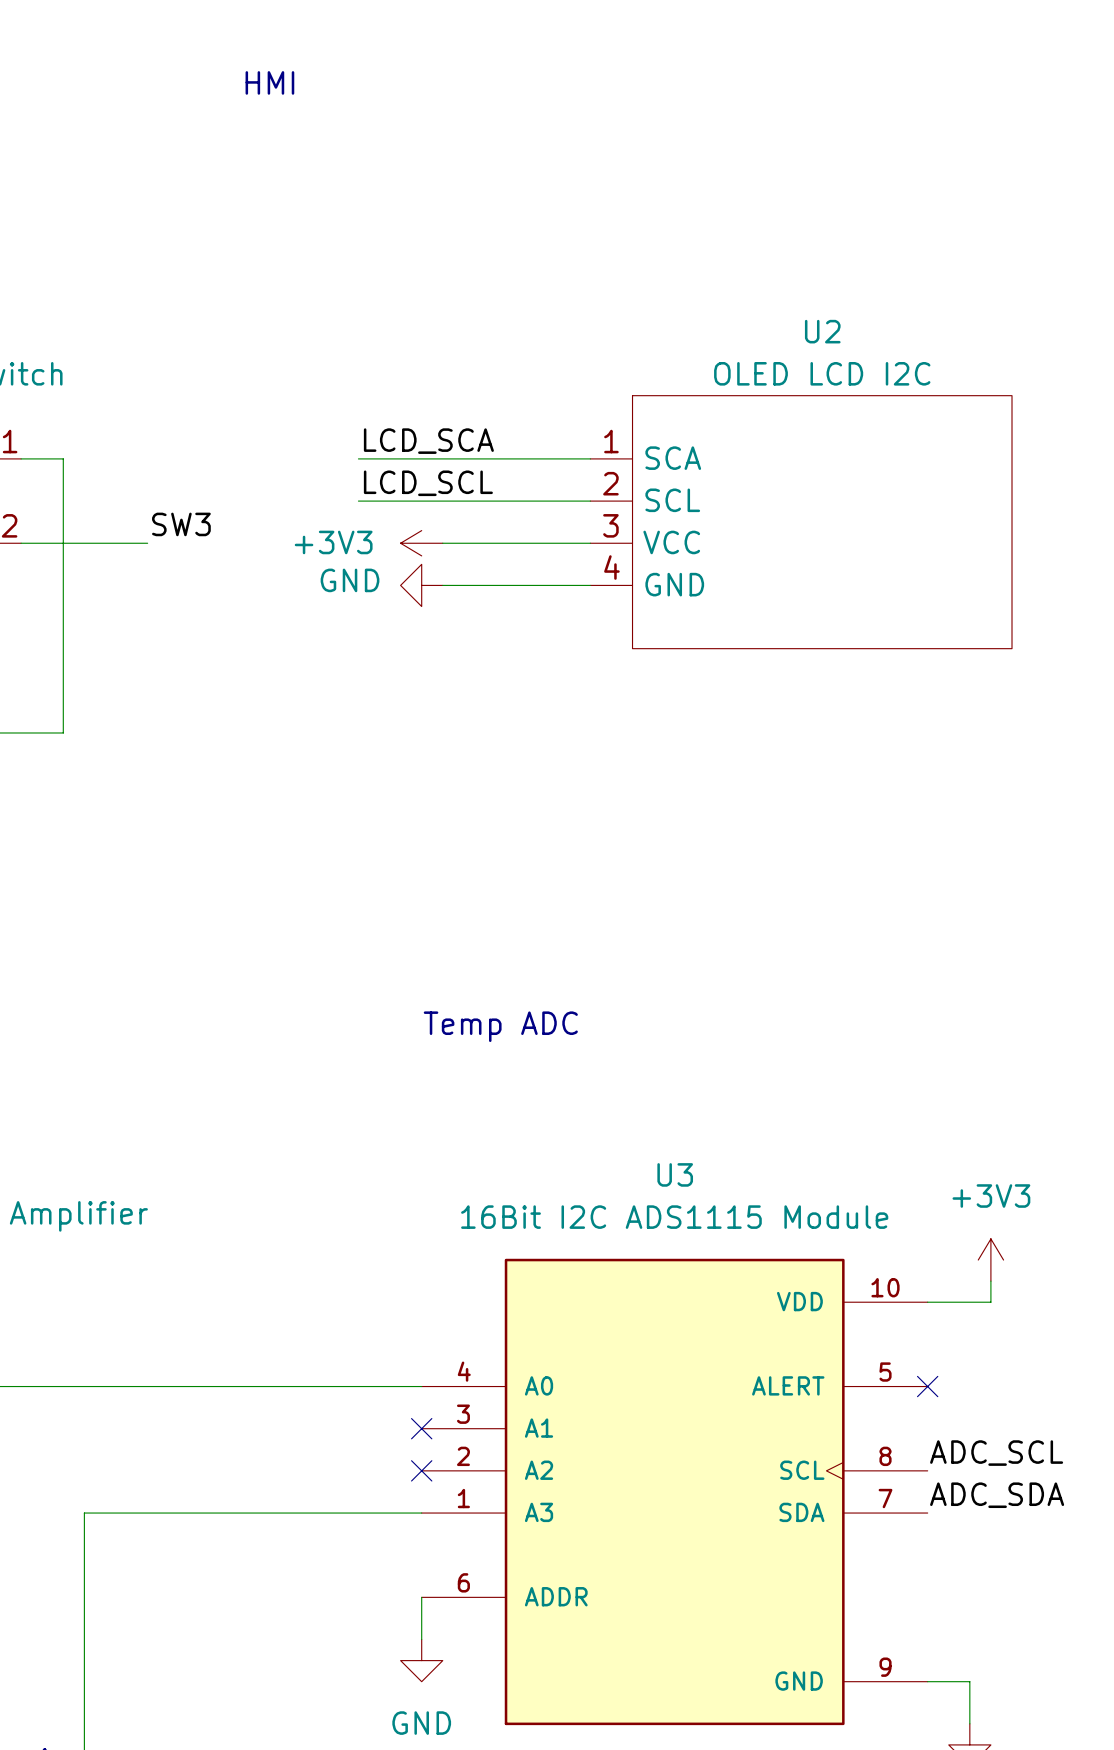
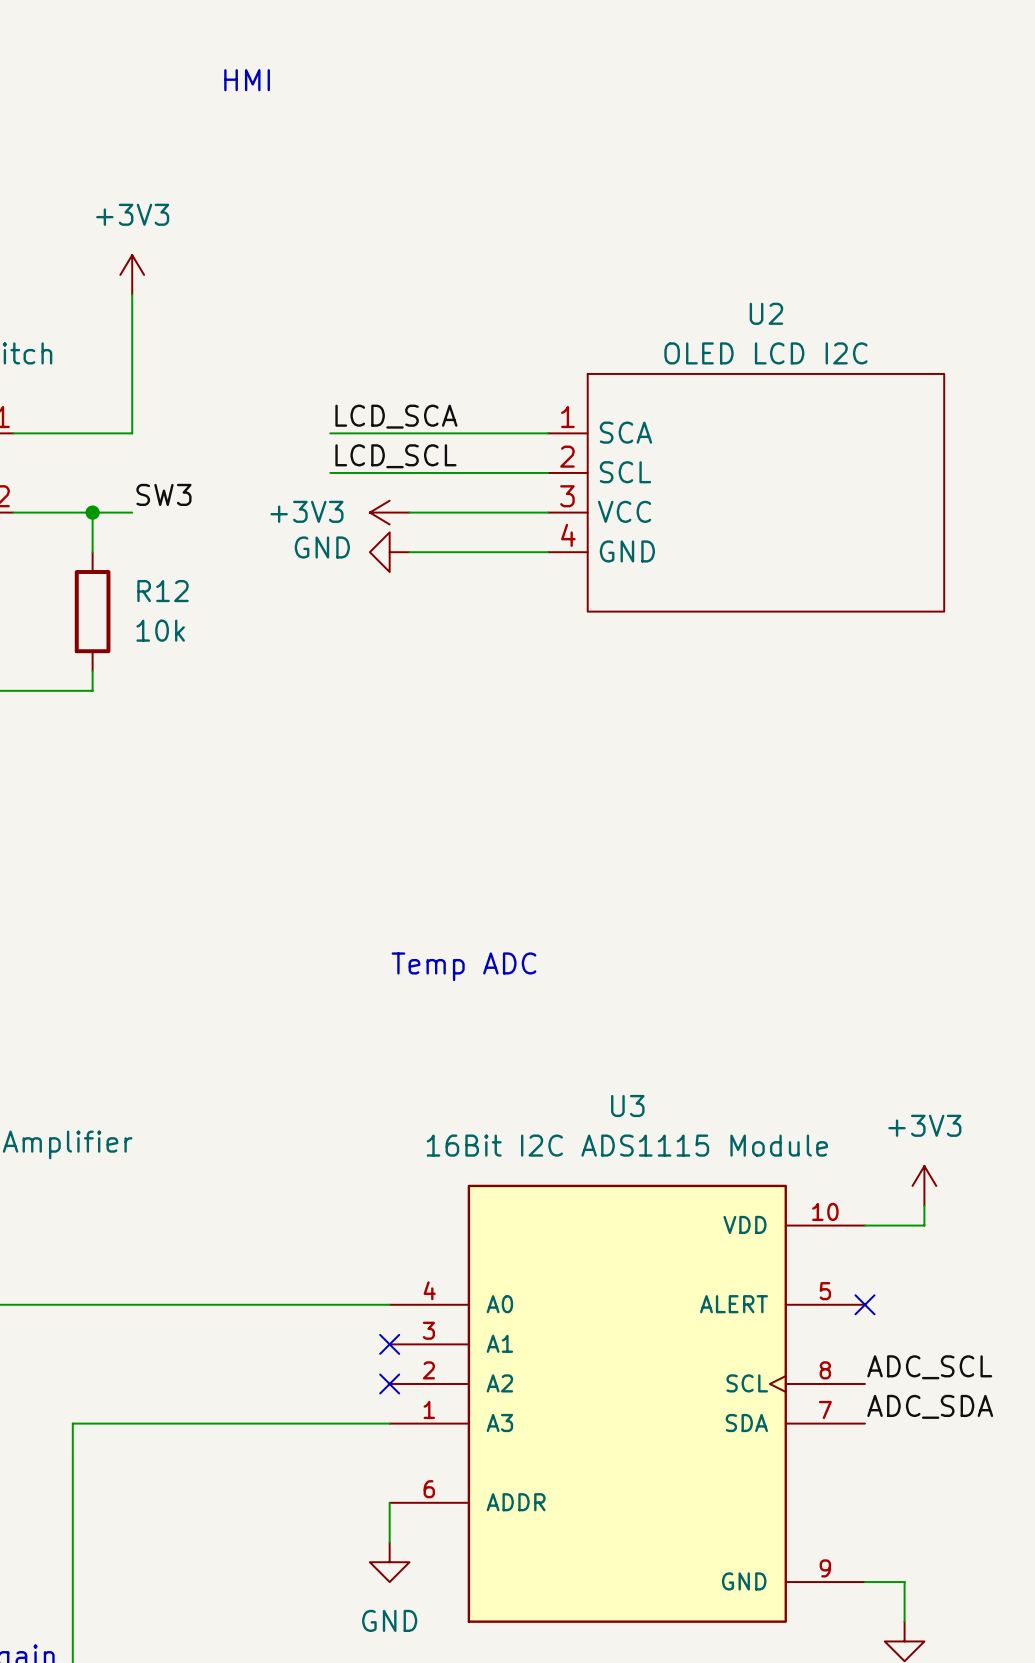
power symbol: none -> +3V3 (132, 274)
wire: none -> (132, 294) (132, 433) (52, 433)
wire: (63, 458) (63, 732) -> (92, 671) (92, 690) (52, 690)
wire: none -> (92, 512) (92, 552)
junction: none -> (92, 512)
R12: none -> 10k (92, 611)

